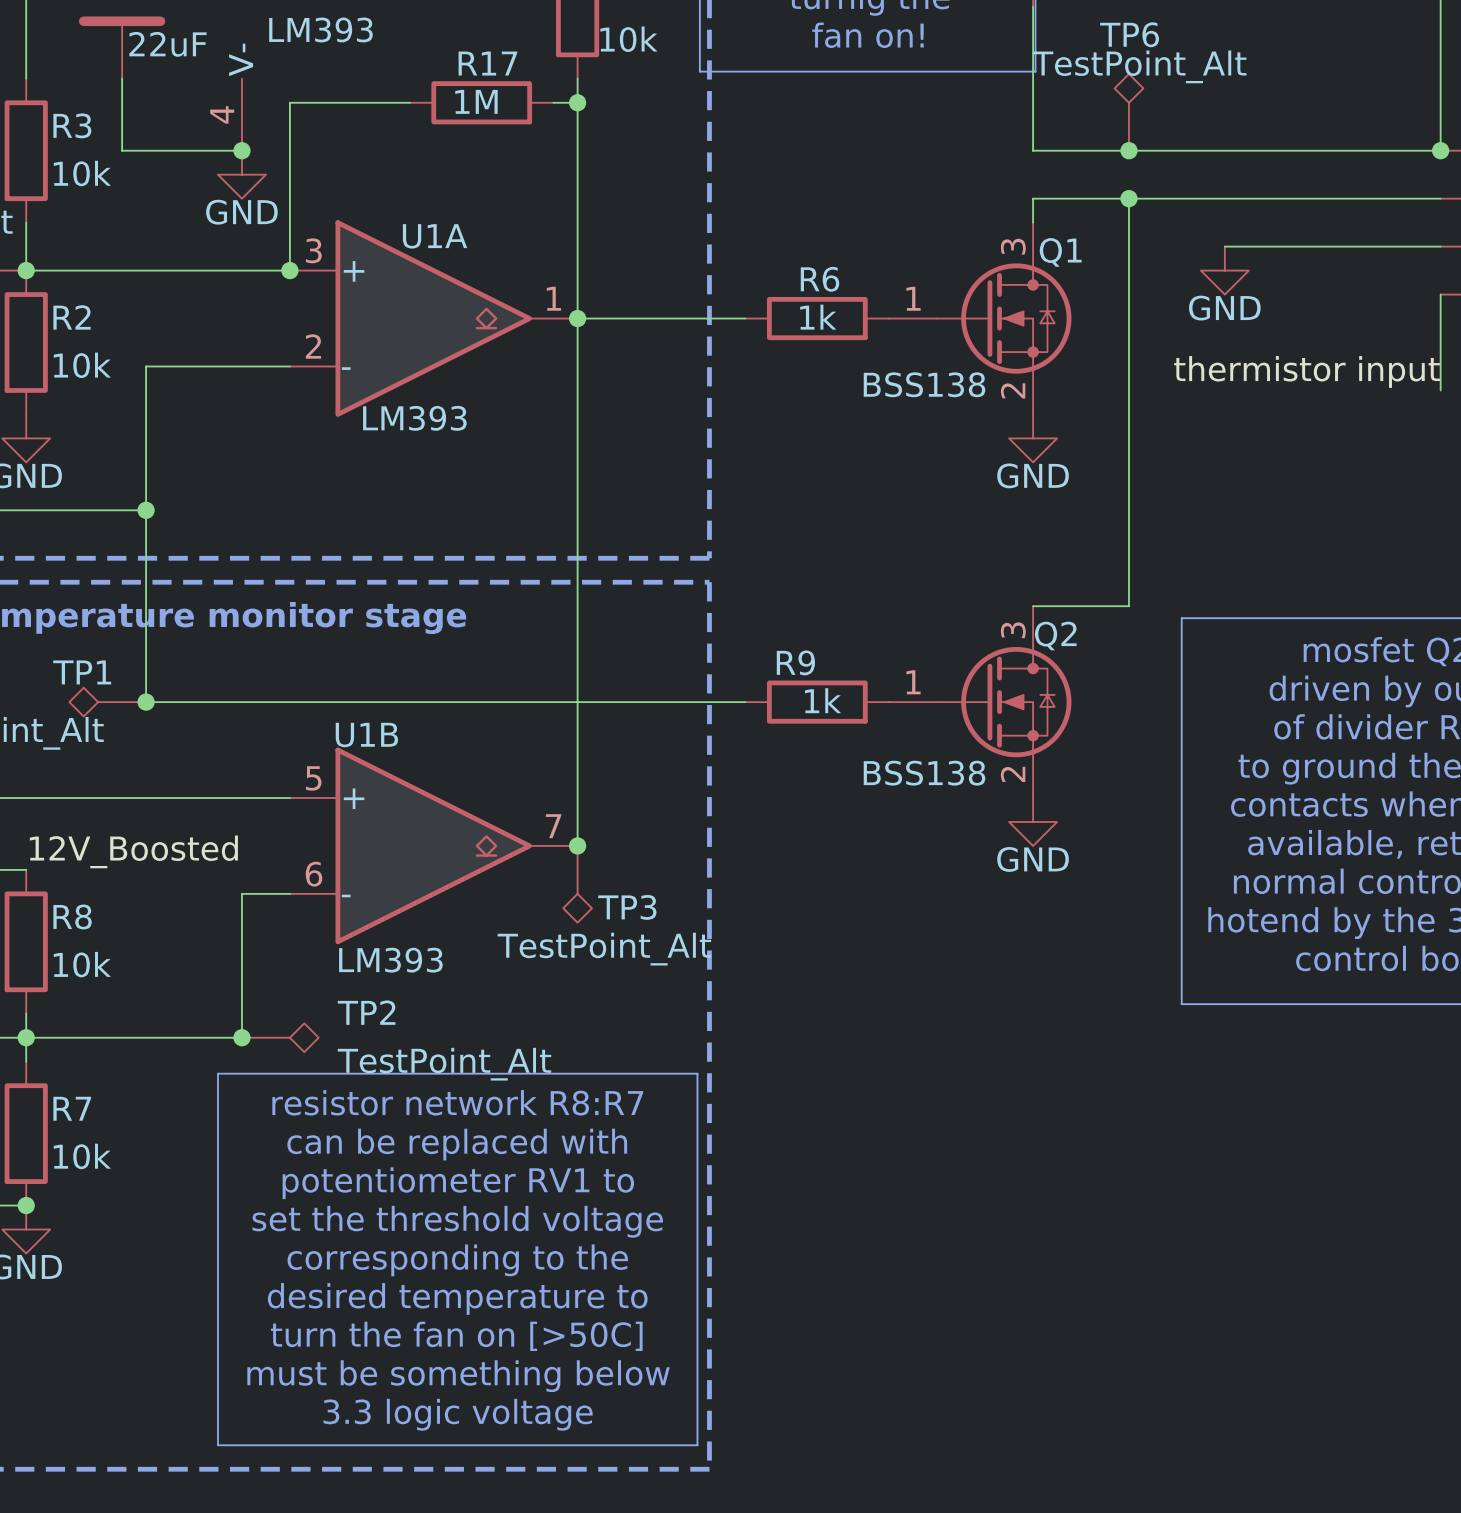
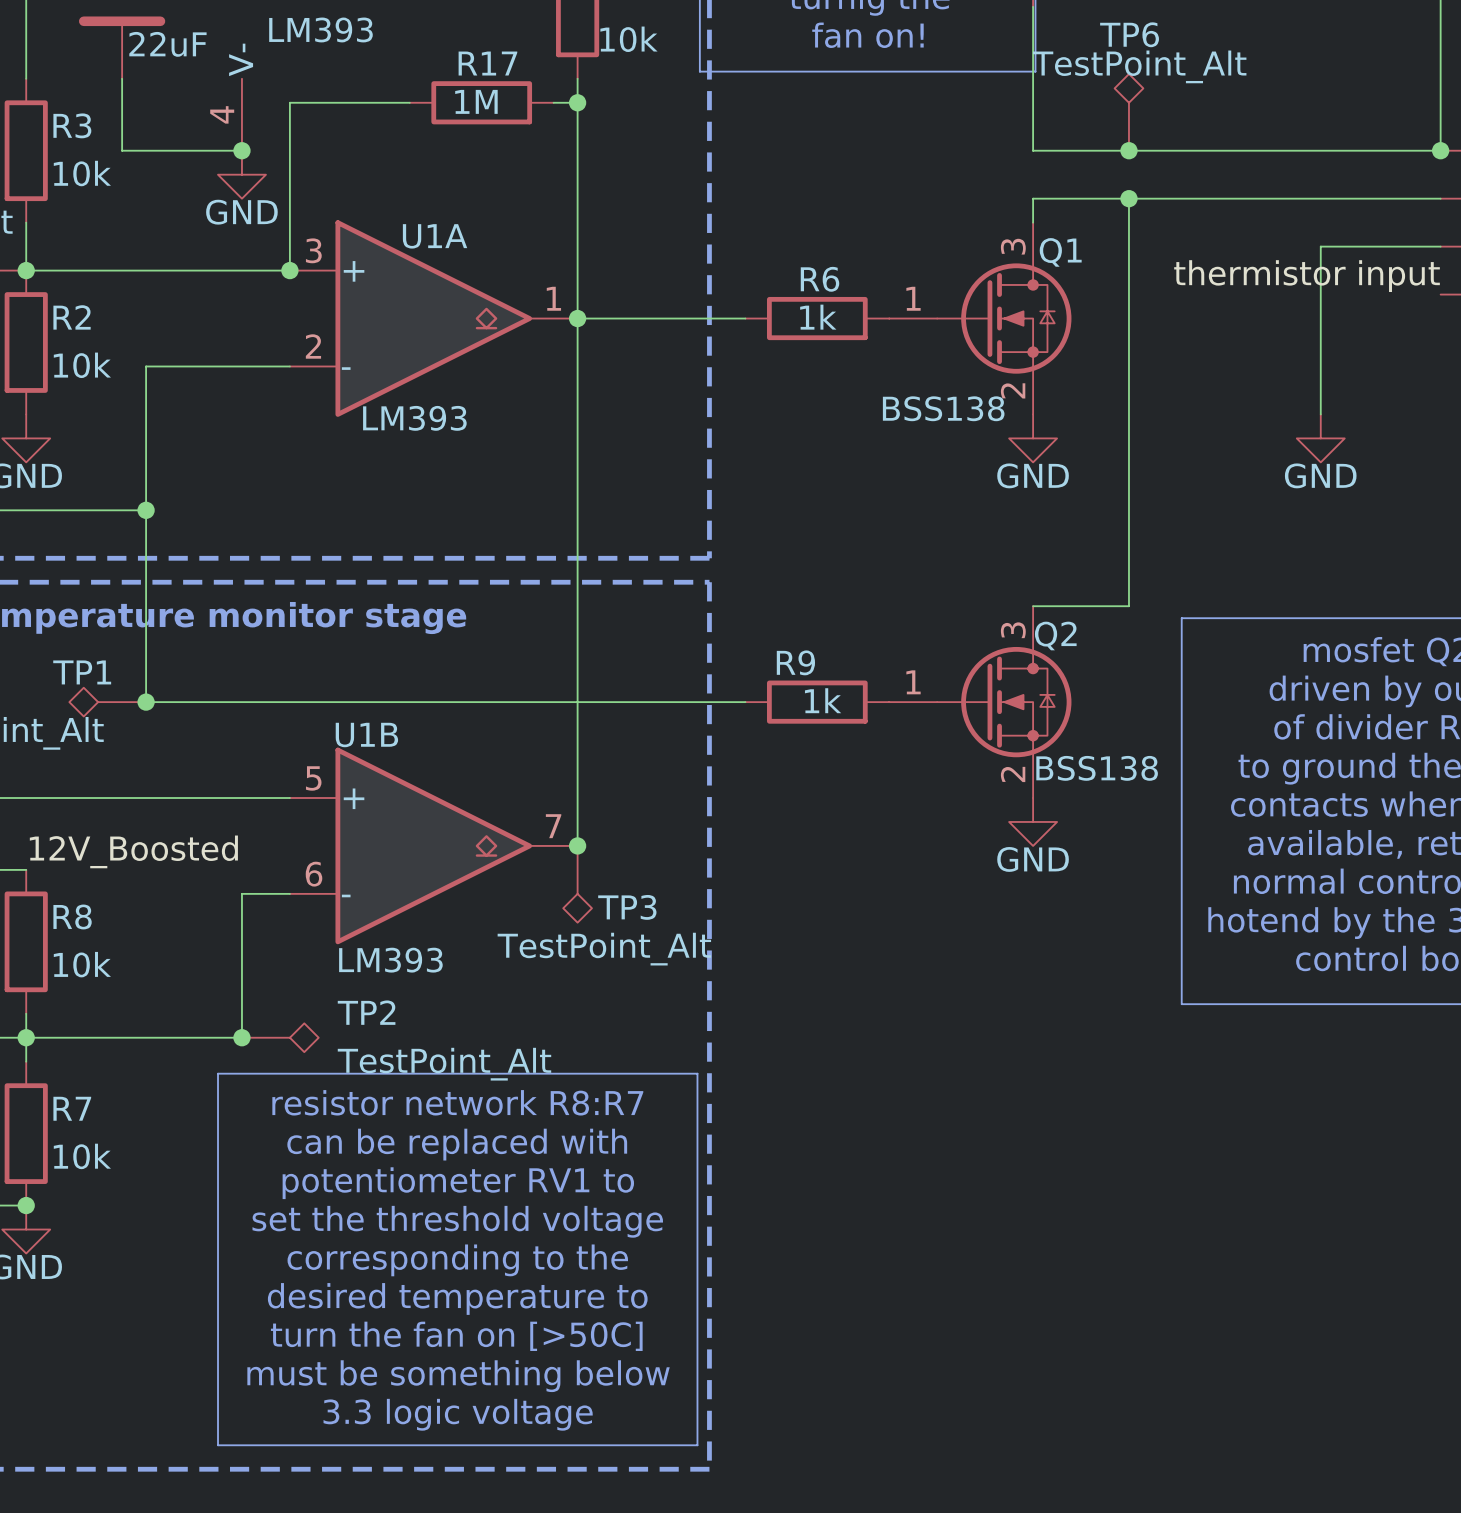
wire: (1224, 246) (1320, 246) -> (1320, 414) (1320, 246)
power symbol position: GND (1224, 270) -> GND (1320, 438)
wire: (1440, 294) (1440, 390) -> none
label position: thermistor input (1307, 371) -> thermistor input (1307, 276)
Q1 value position: BSS138 (924, 384) -> BSS138 (943, 408)
Q2 value position: BSS138 (924, 773) -> BSS138 (1097, 768)

